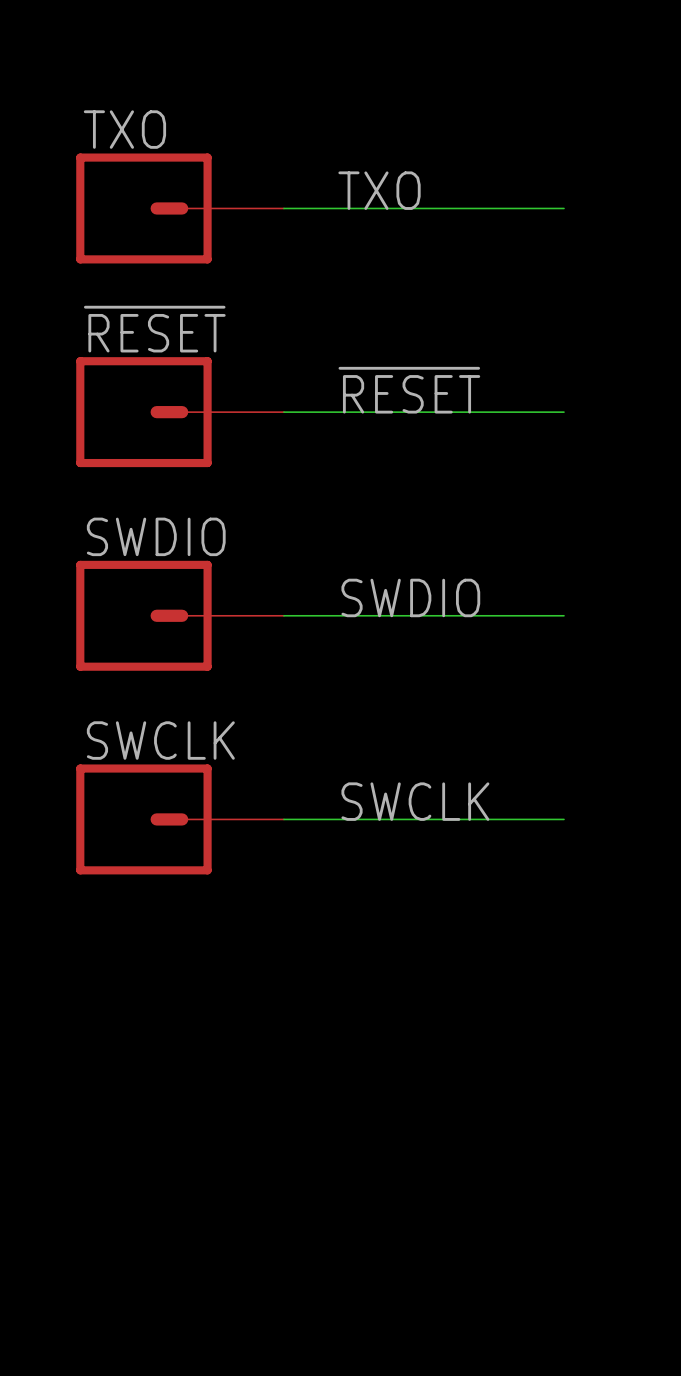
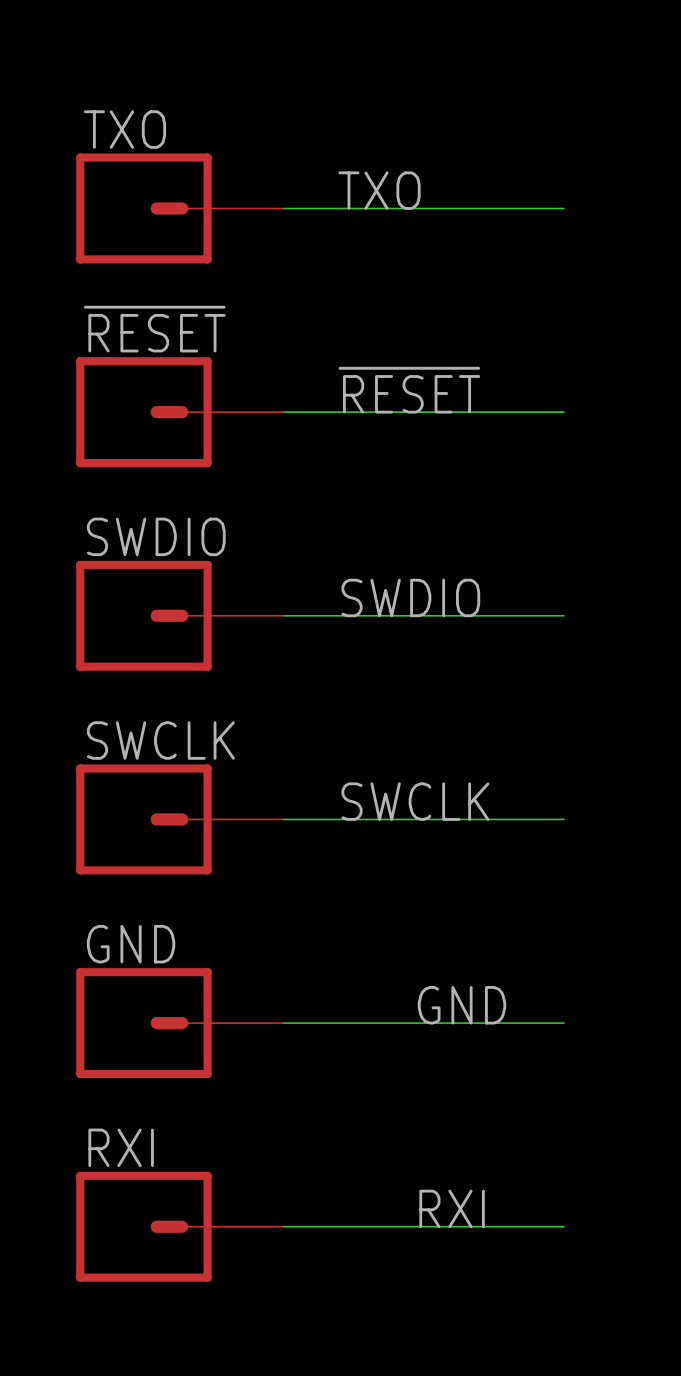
label: none -> GND (461, 1005)
GND: none -> (180, 1023)
wire: none -> (283, 1023) (563, 1023)
label: none -> RXI (452, 1208)
RXI: none -> (180, 1226)
wire: none -> (283, 1226) (563, 1226)

